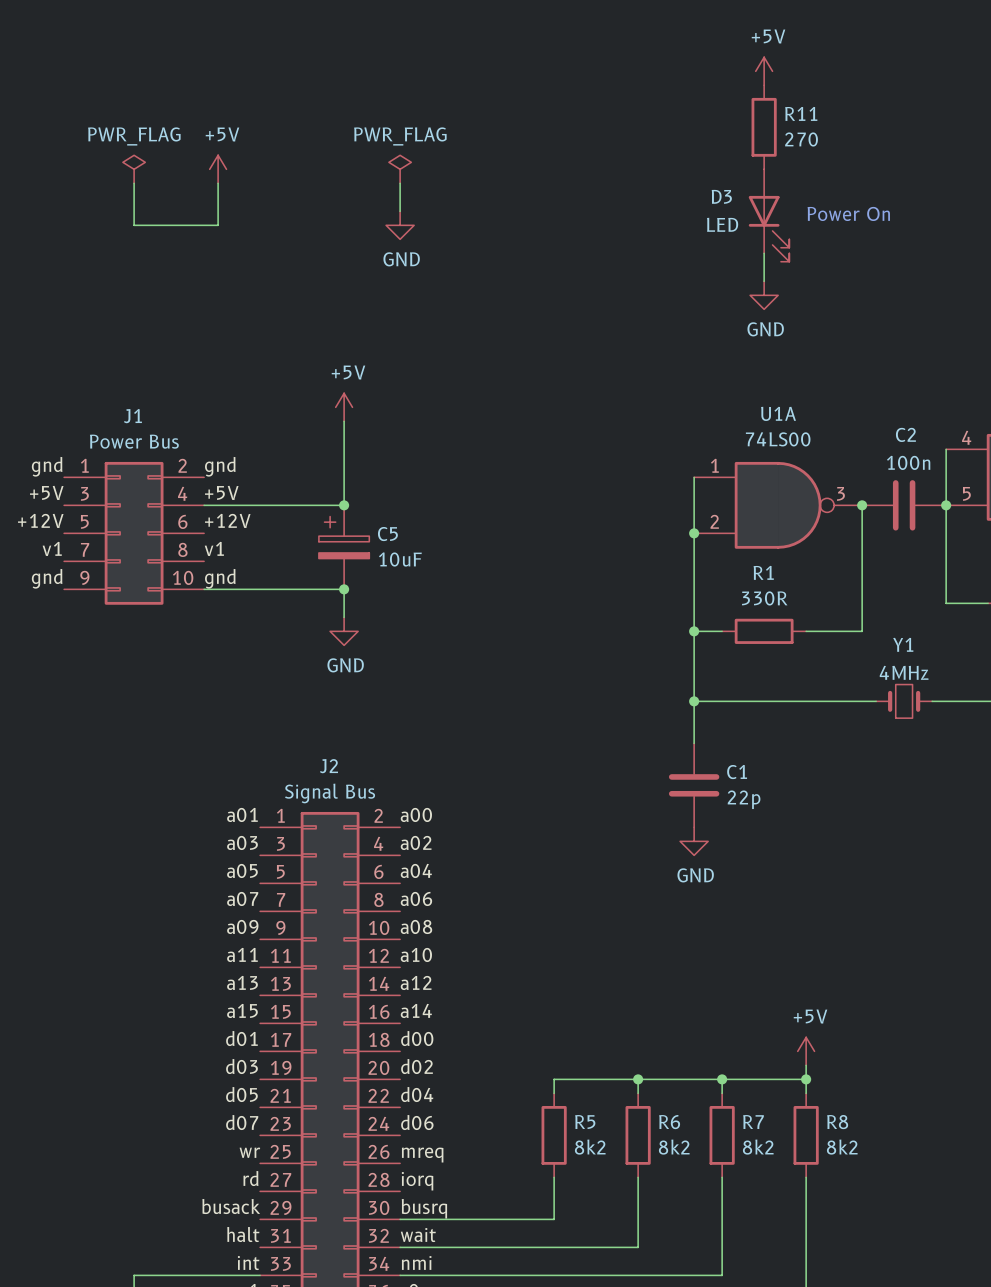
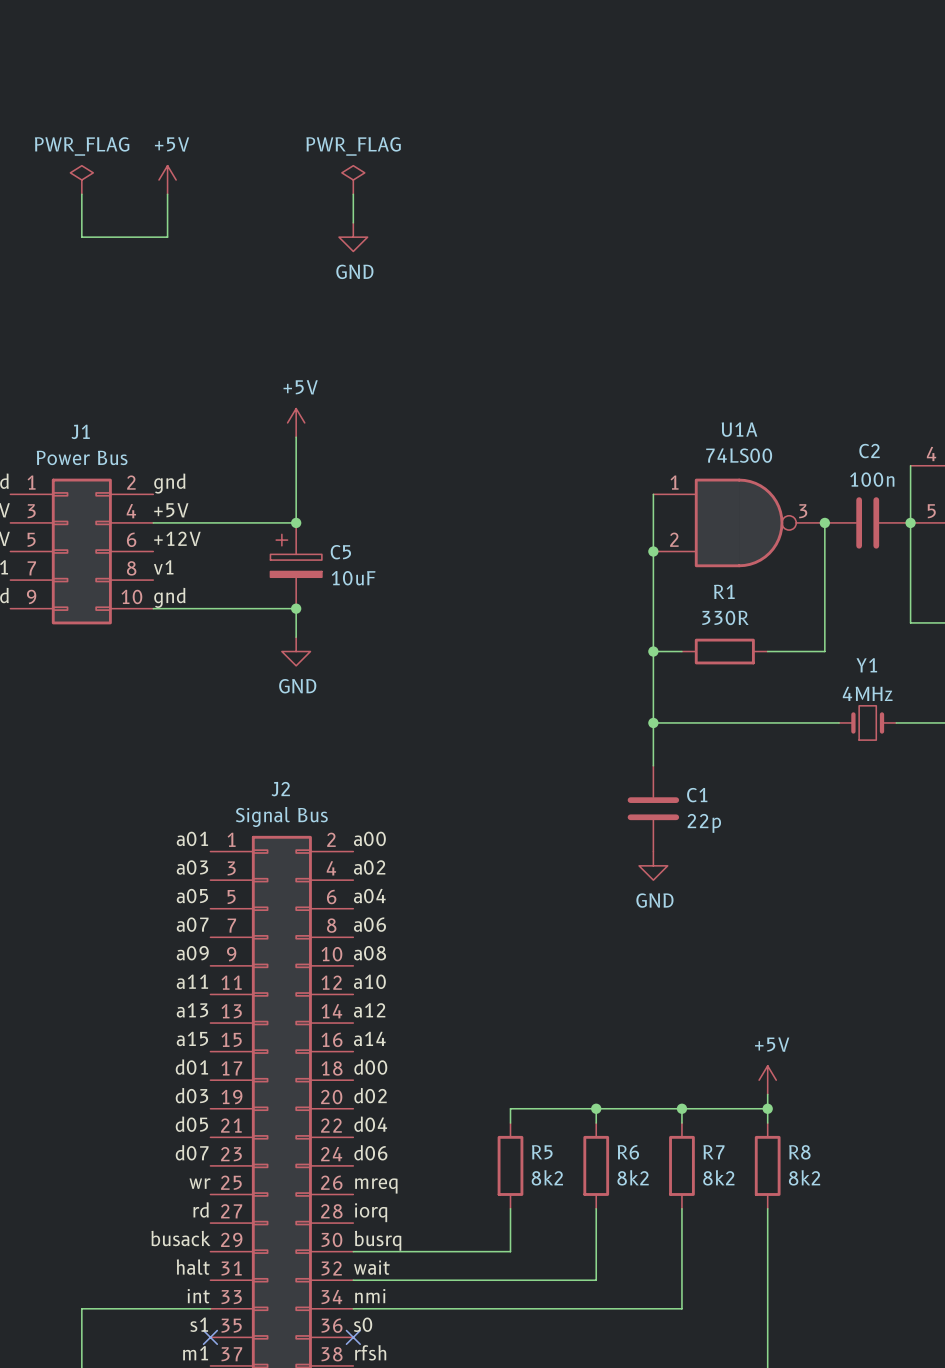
power symbol: +5V (764, 71) -> none
R11: 270 (764, 127) -> none
text: Power On (848, 213) -> none
D3: LED (769, 215) -> none
wire: (764, 253) (764, 281) -> none
power symbol: GND (764, 295) -> none

